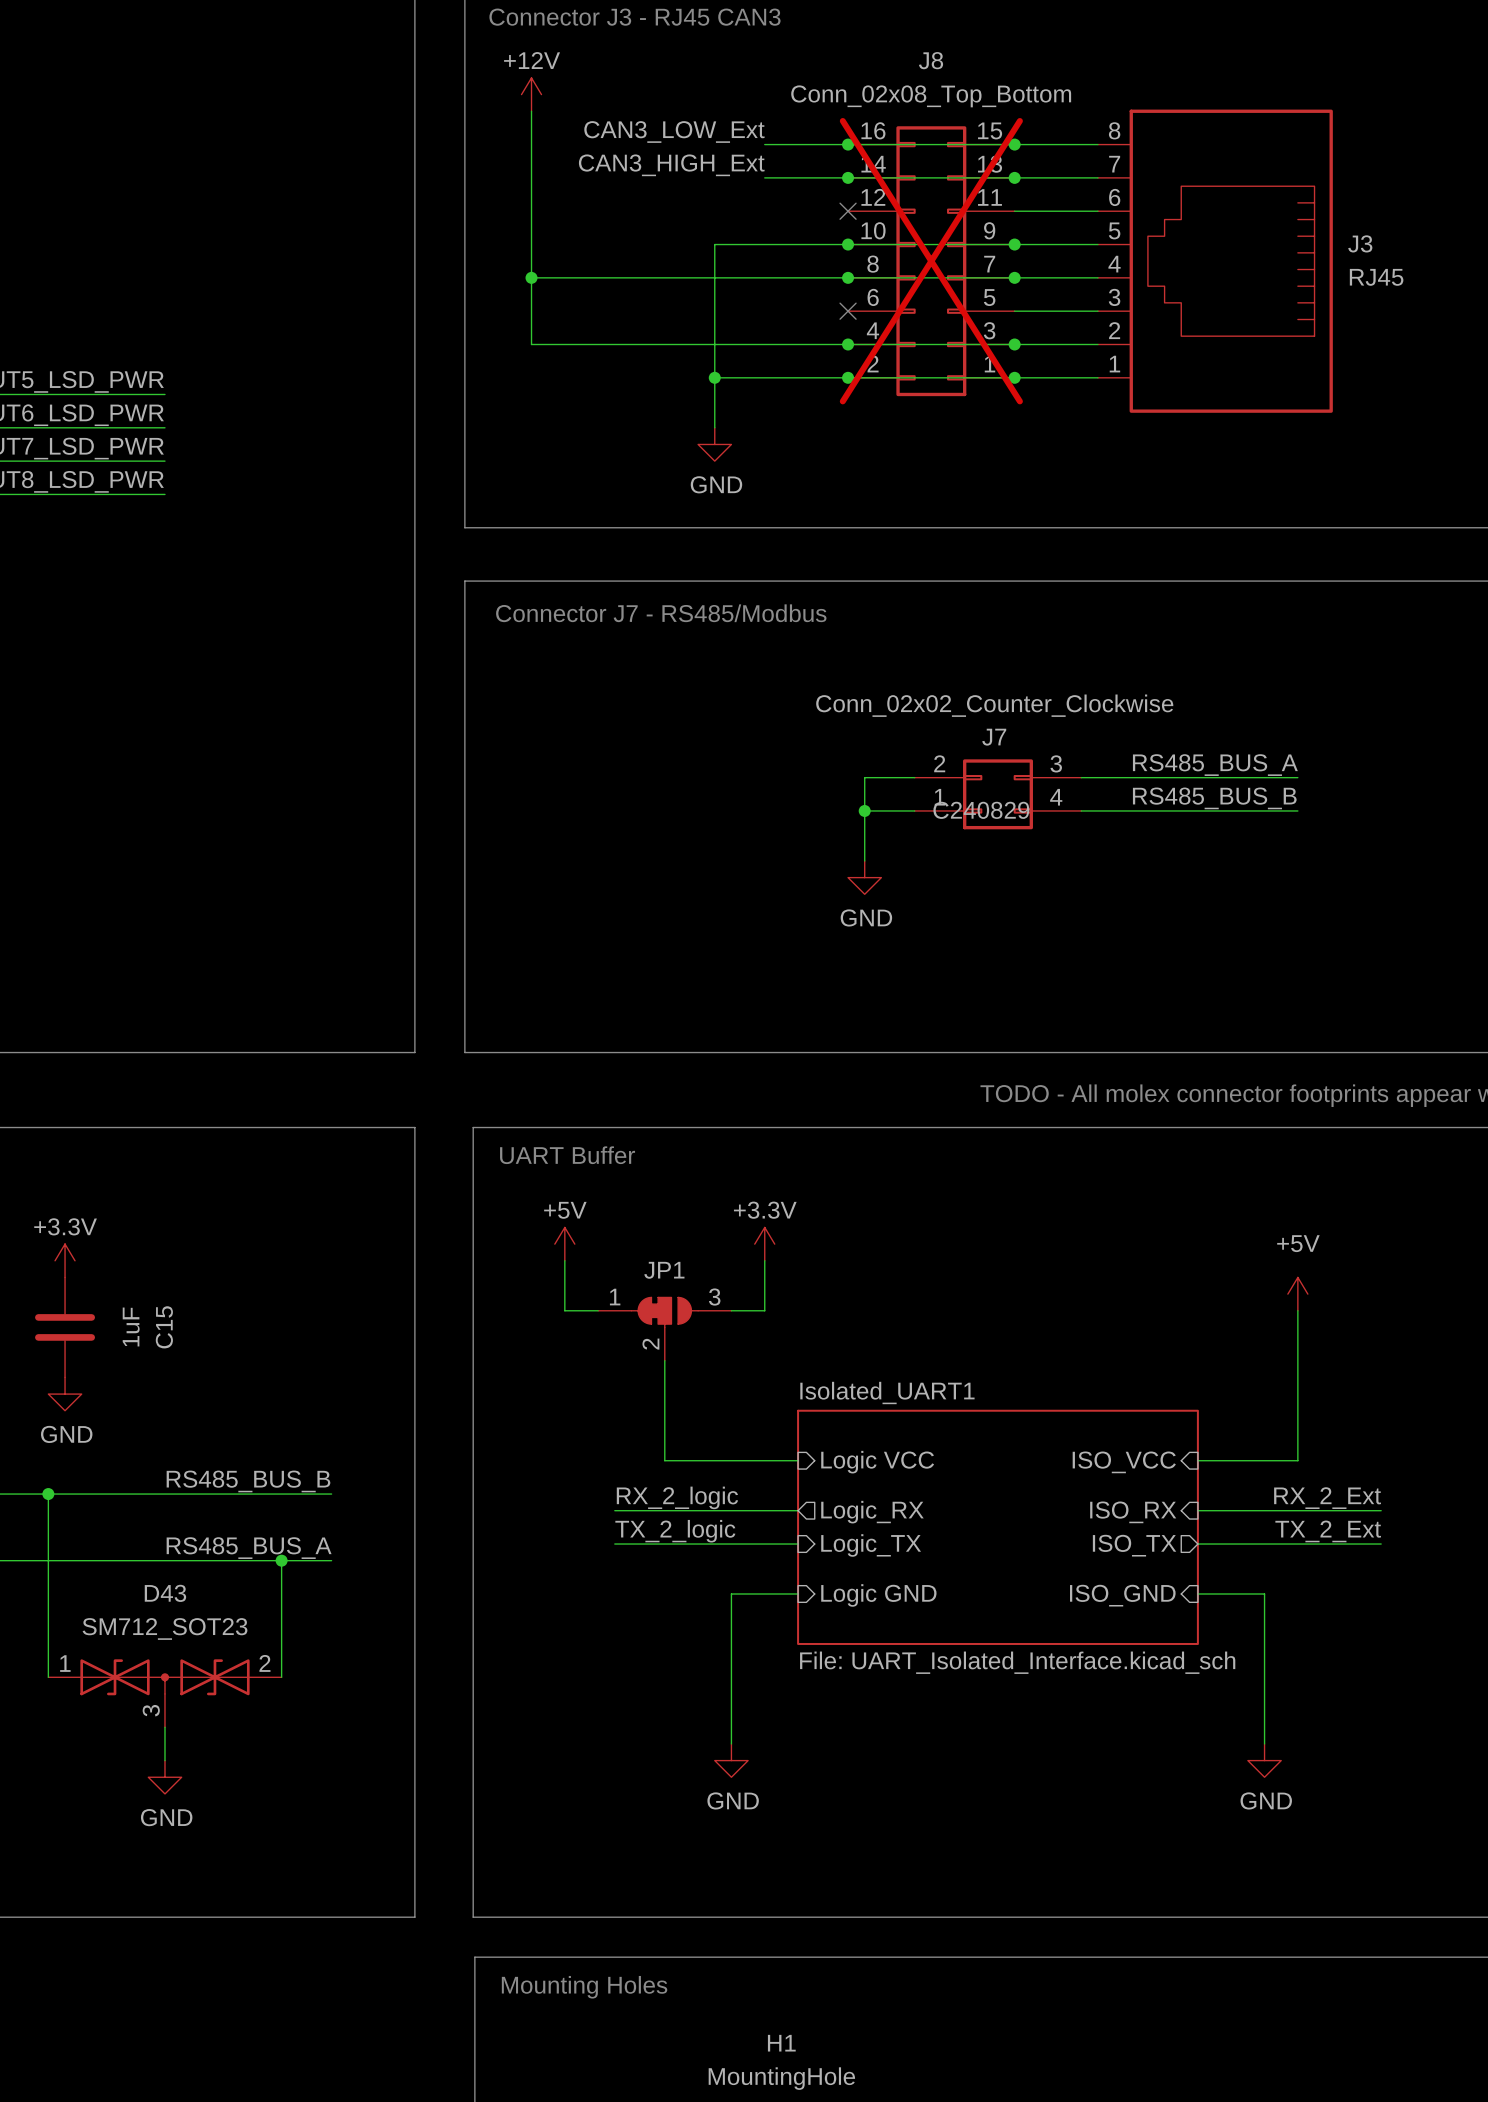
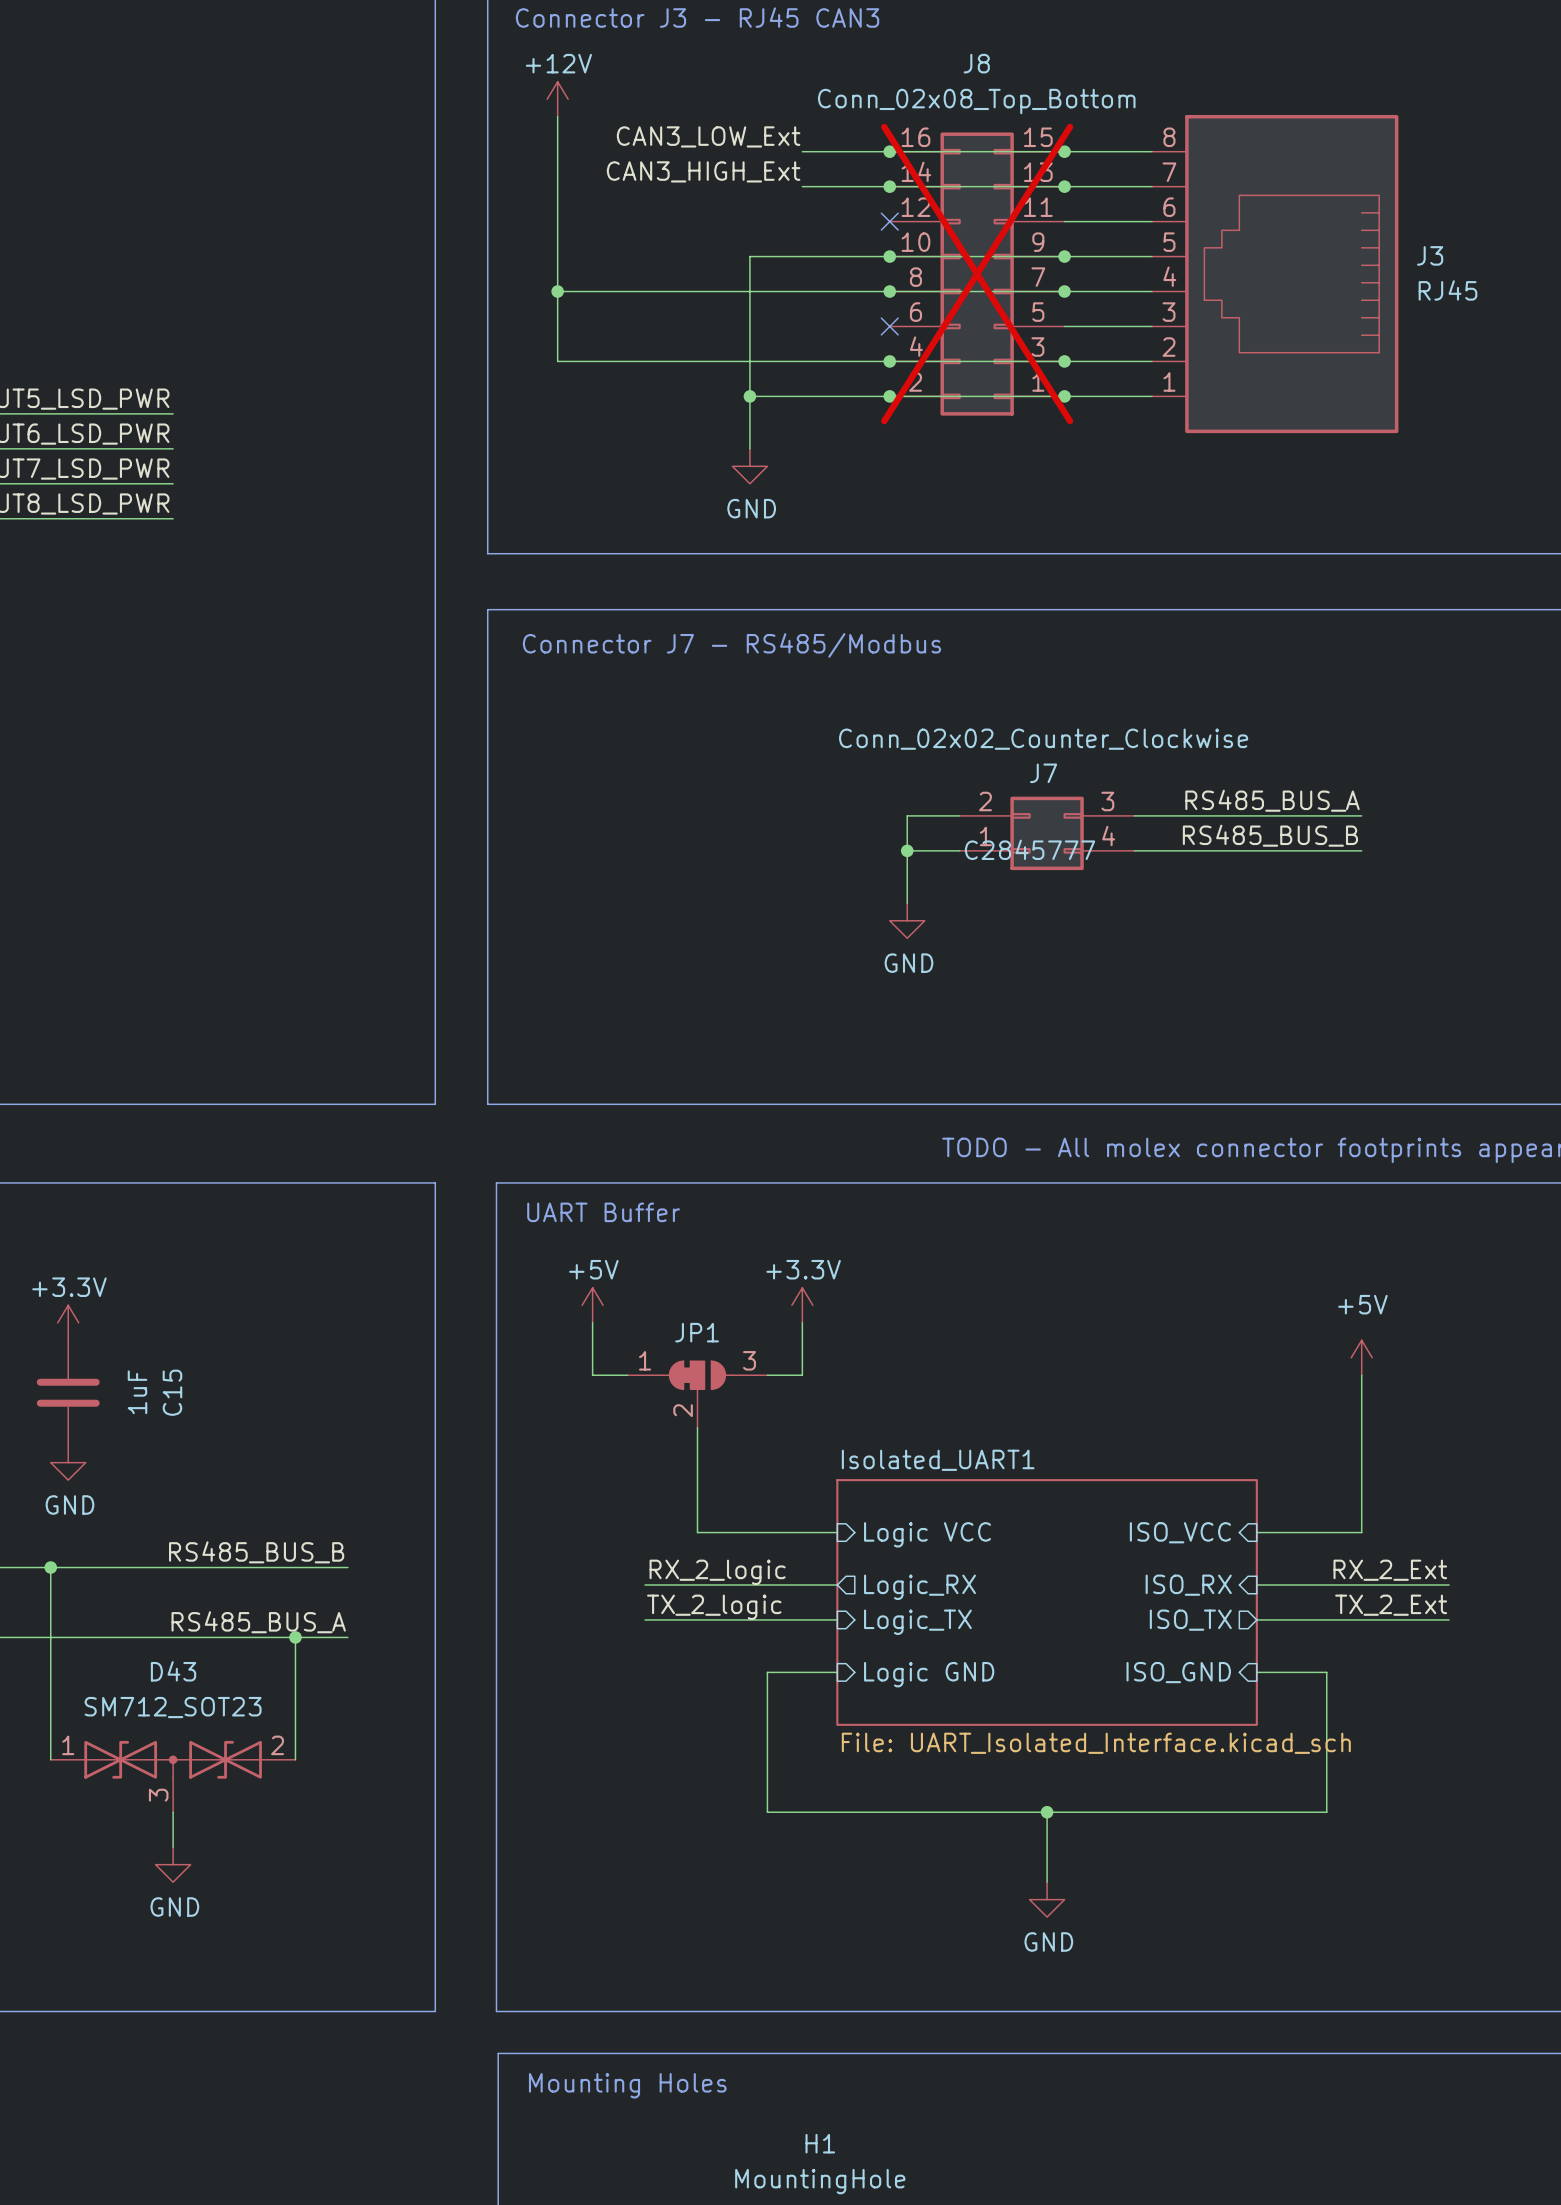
J7 text: C240829 (981, 810) -> C2845777 (1030, 849)
wire: (731, 1727) (731, 1743) -> (767, 1812) (1326, 1812)
wire: none -> (1047, 1812) (1047, 1882)
junction: none -> (1047, 1812)
wire: (1264, 1727) (1264, 1743) -> none
power symbol: GND (731, 1760) -> none
power symbol: GND (1264, 1760) -> none
power symbol: none -> GND (1047, 1899)

